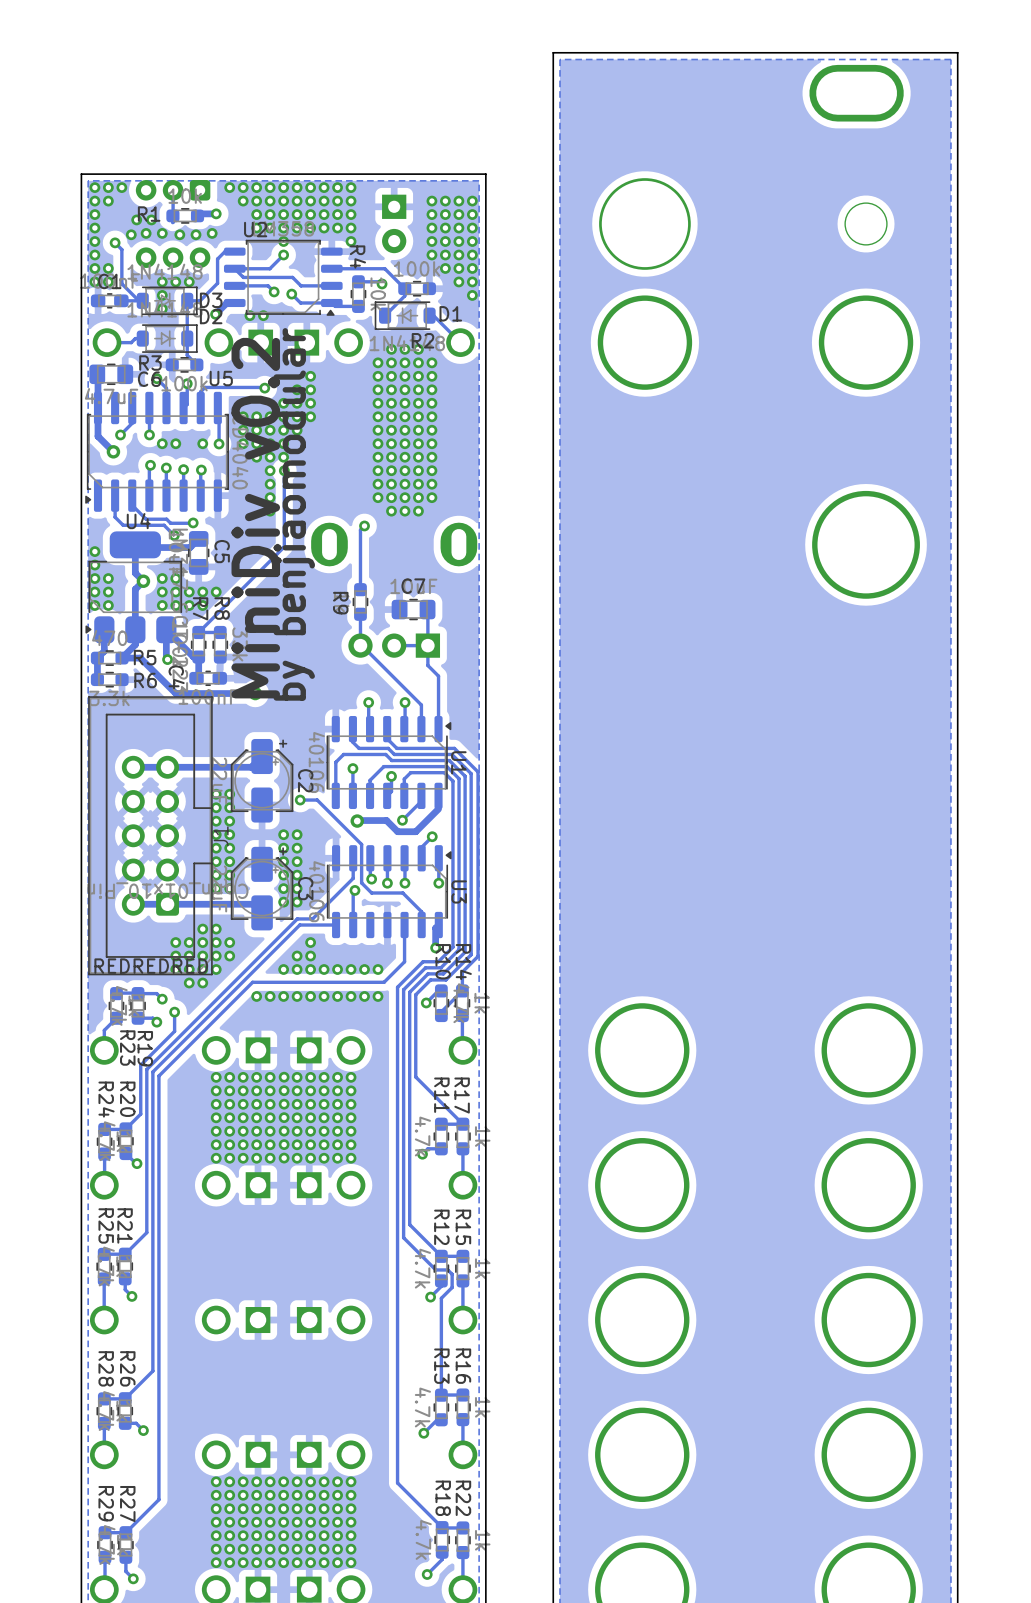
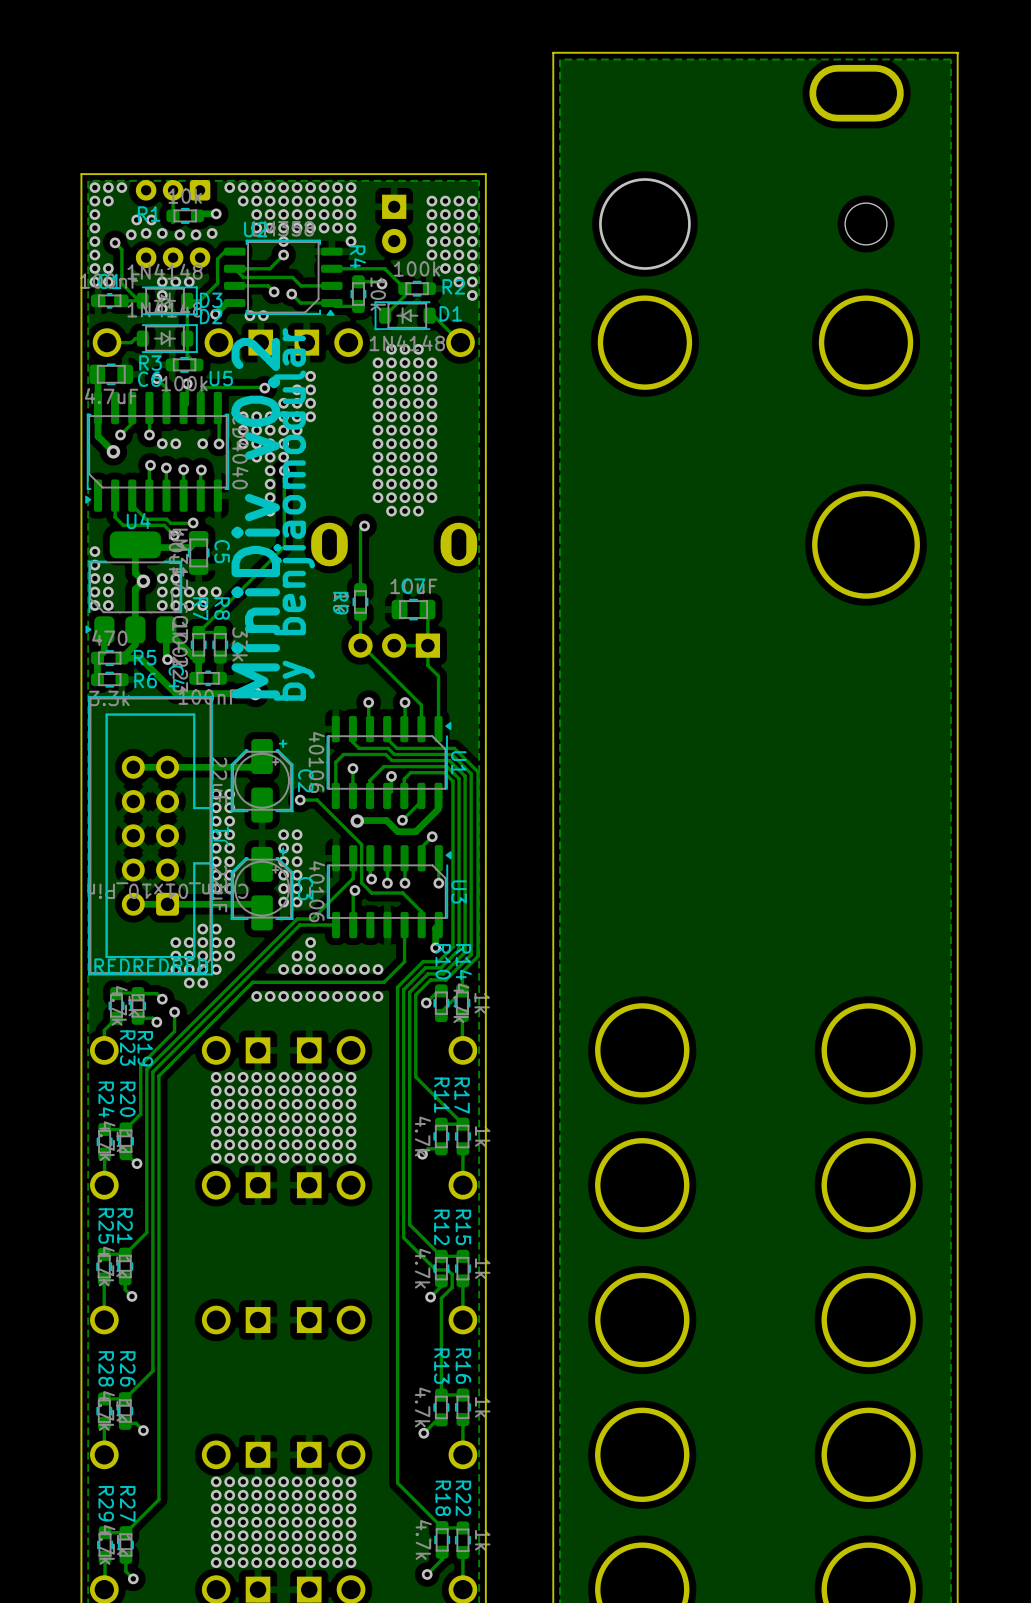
R2 name position: R2 (422, 340) -> R2 (453, 286)

